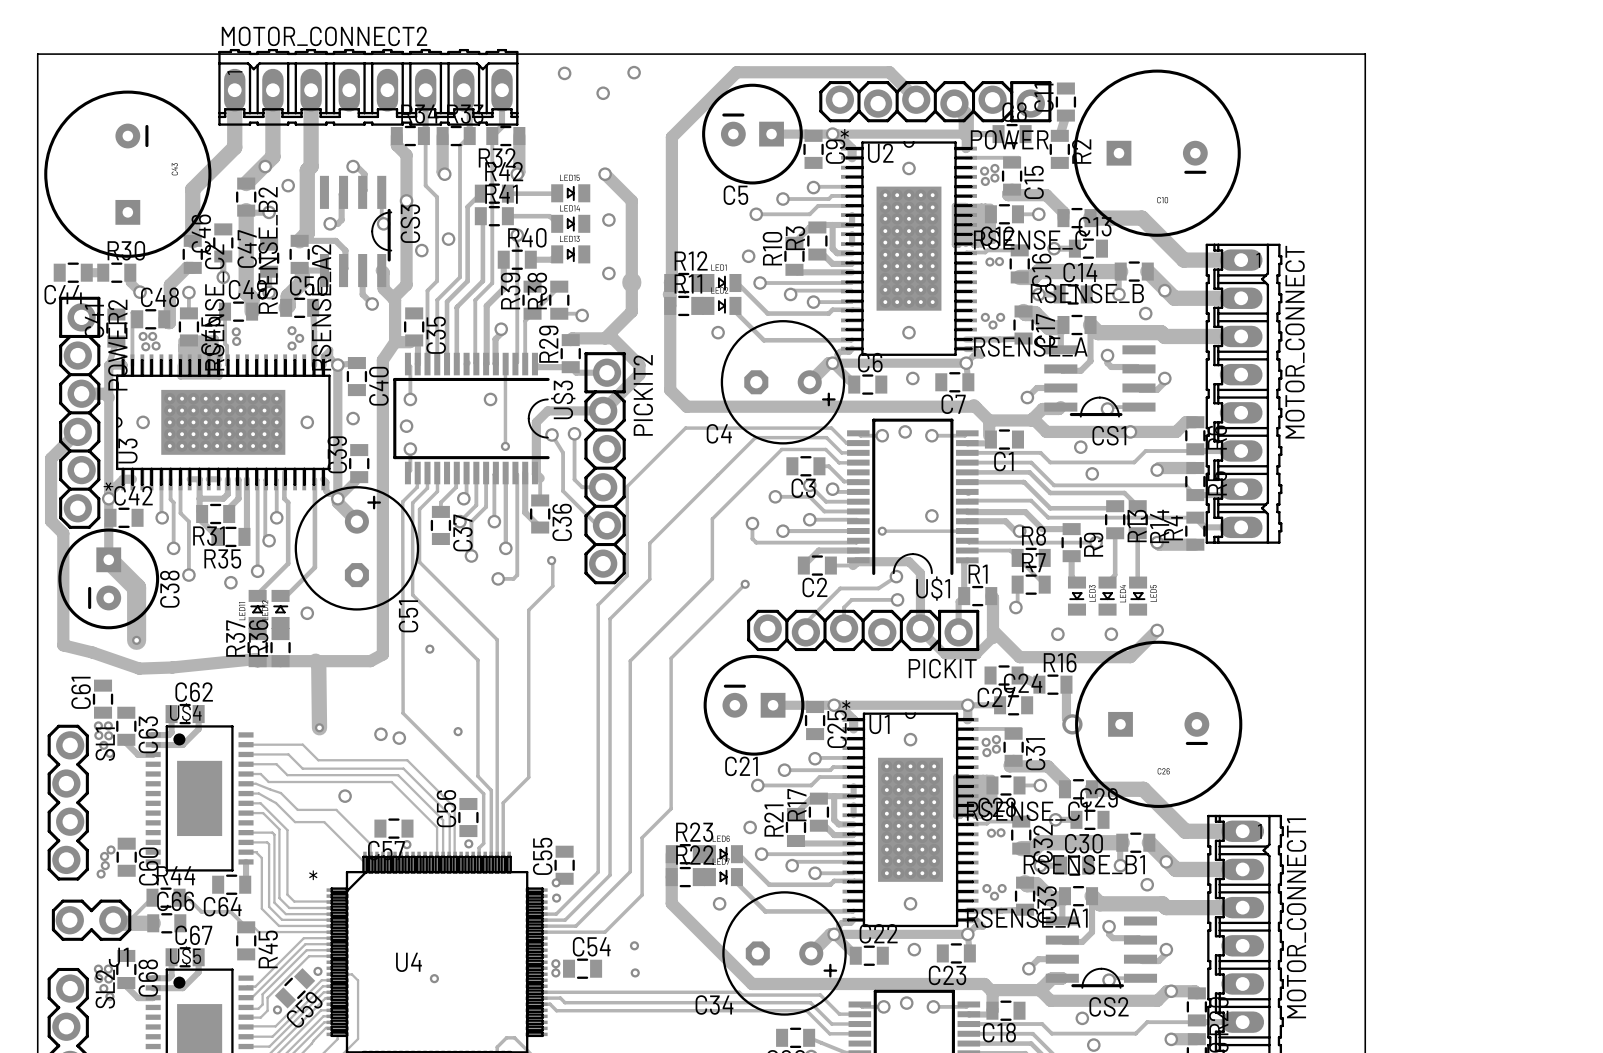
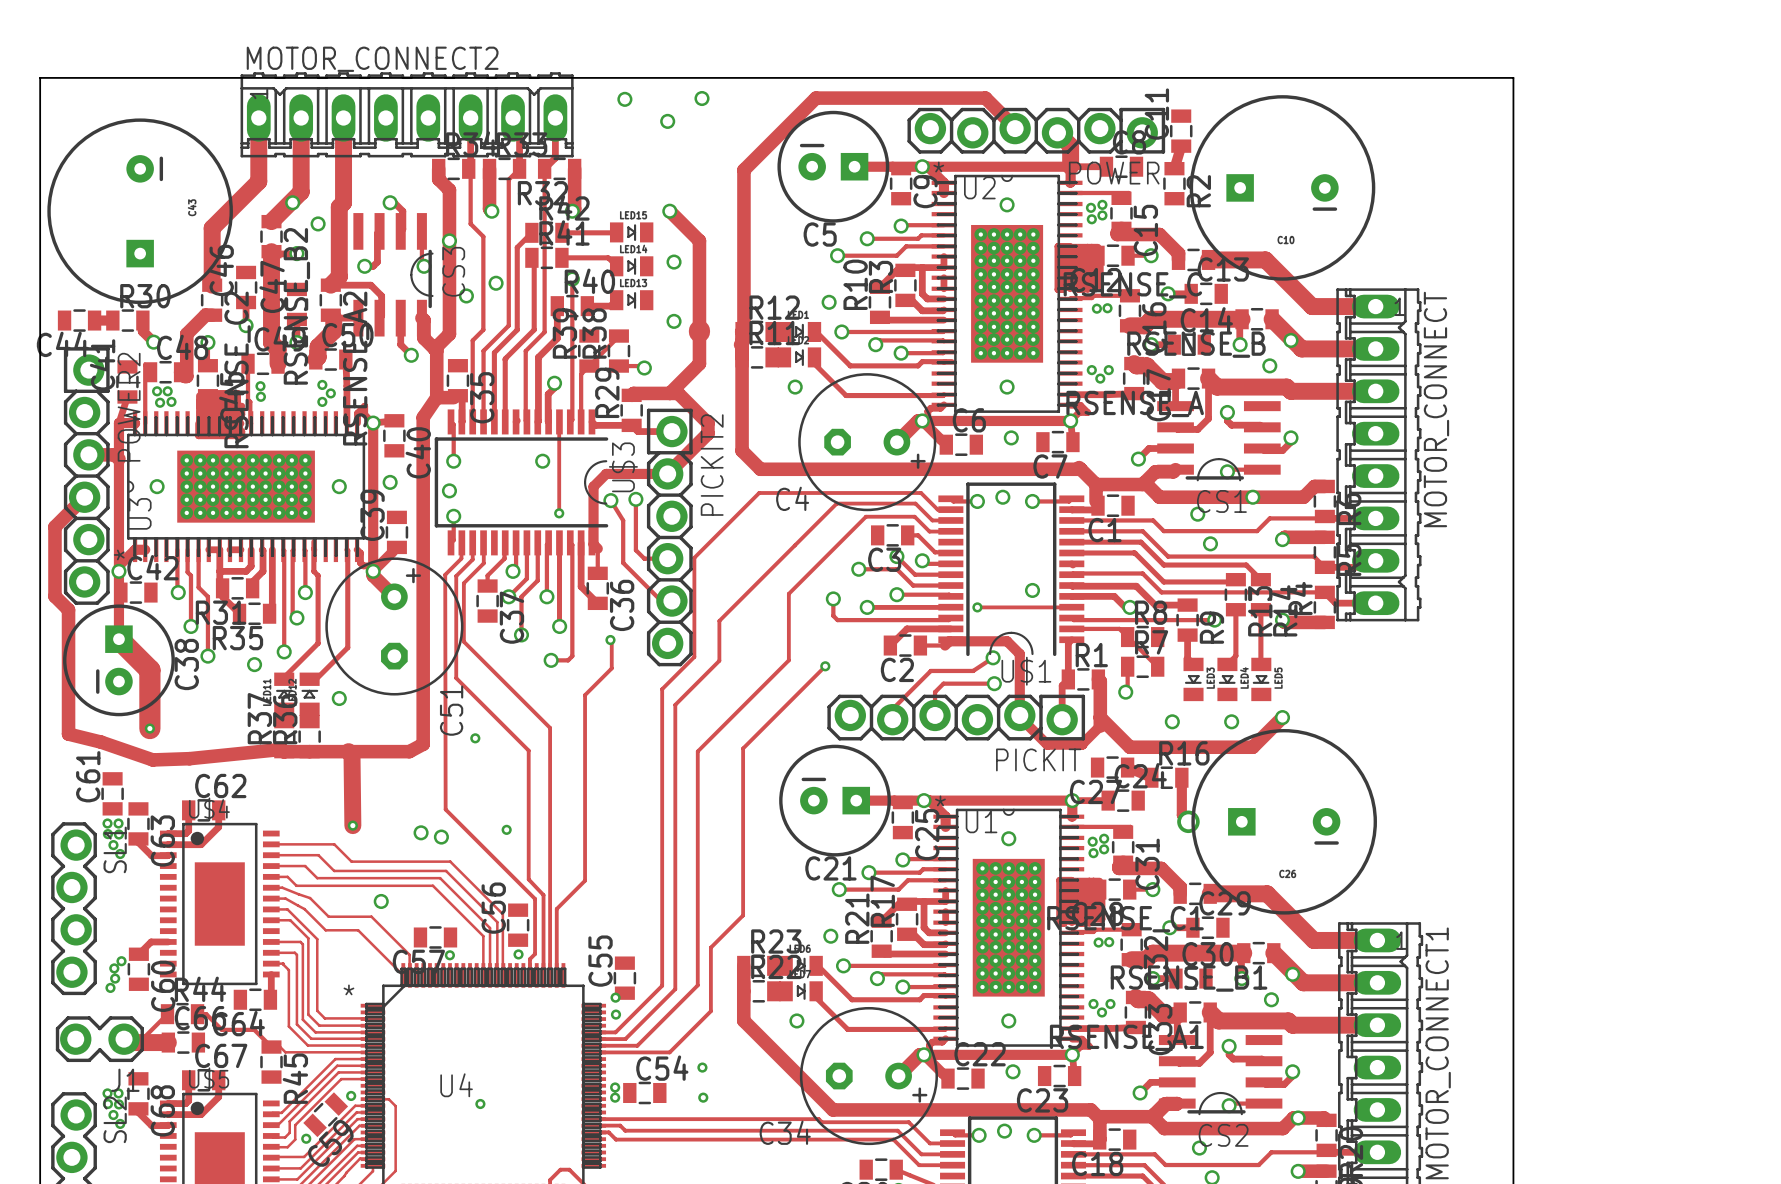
track: none -> (168, 941) (151, 941) (138, 954)

